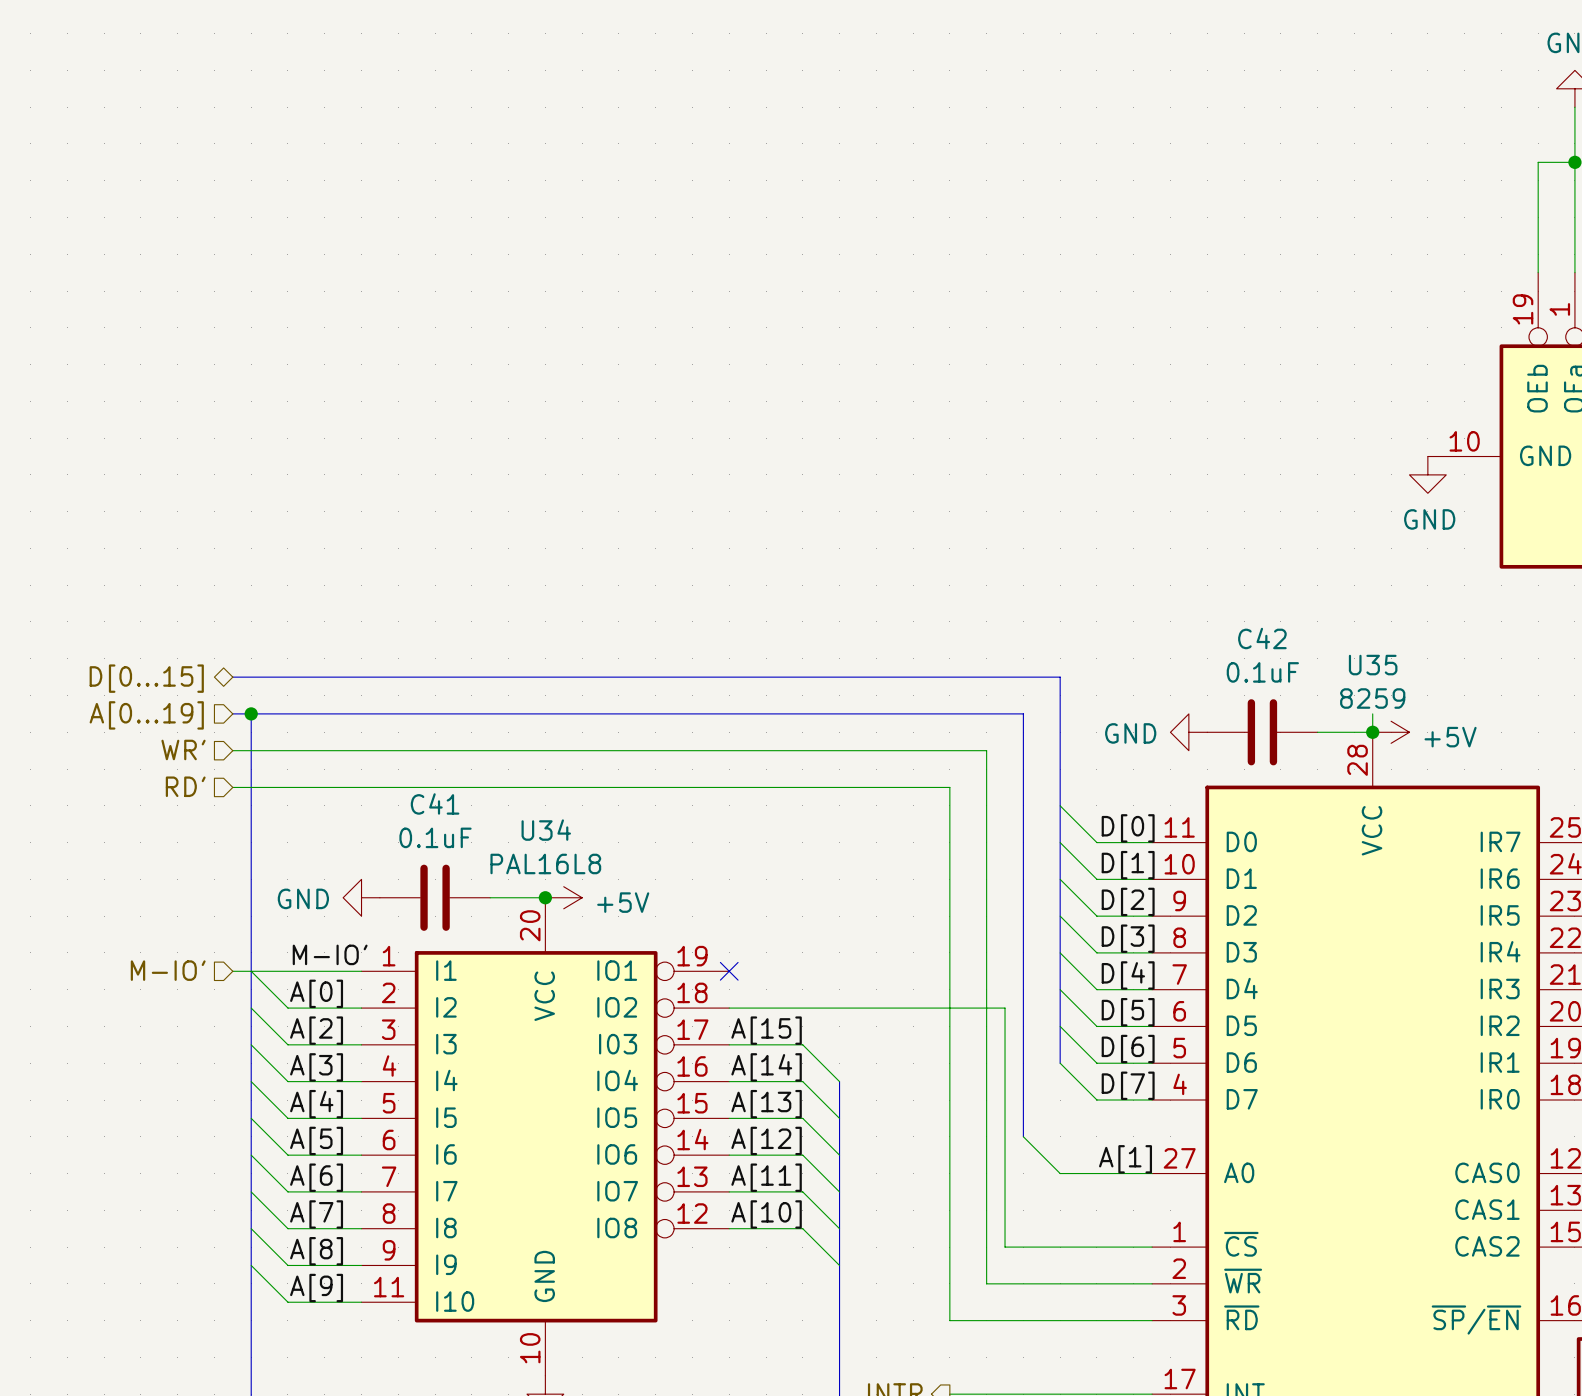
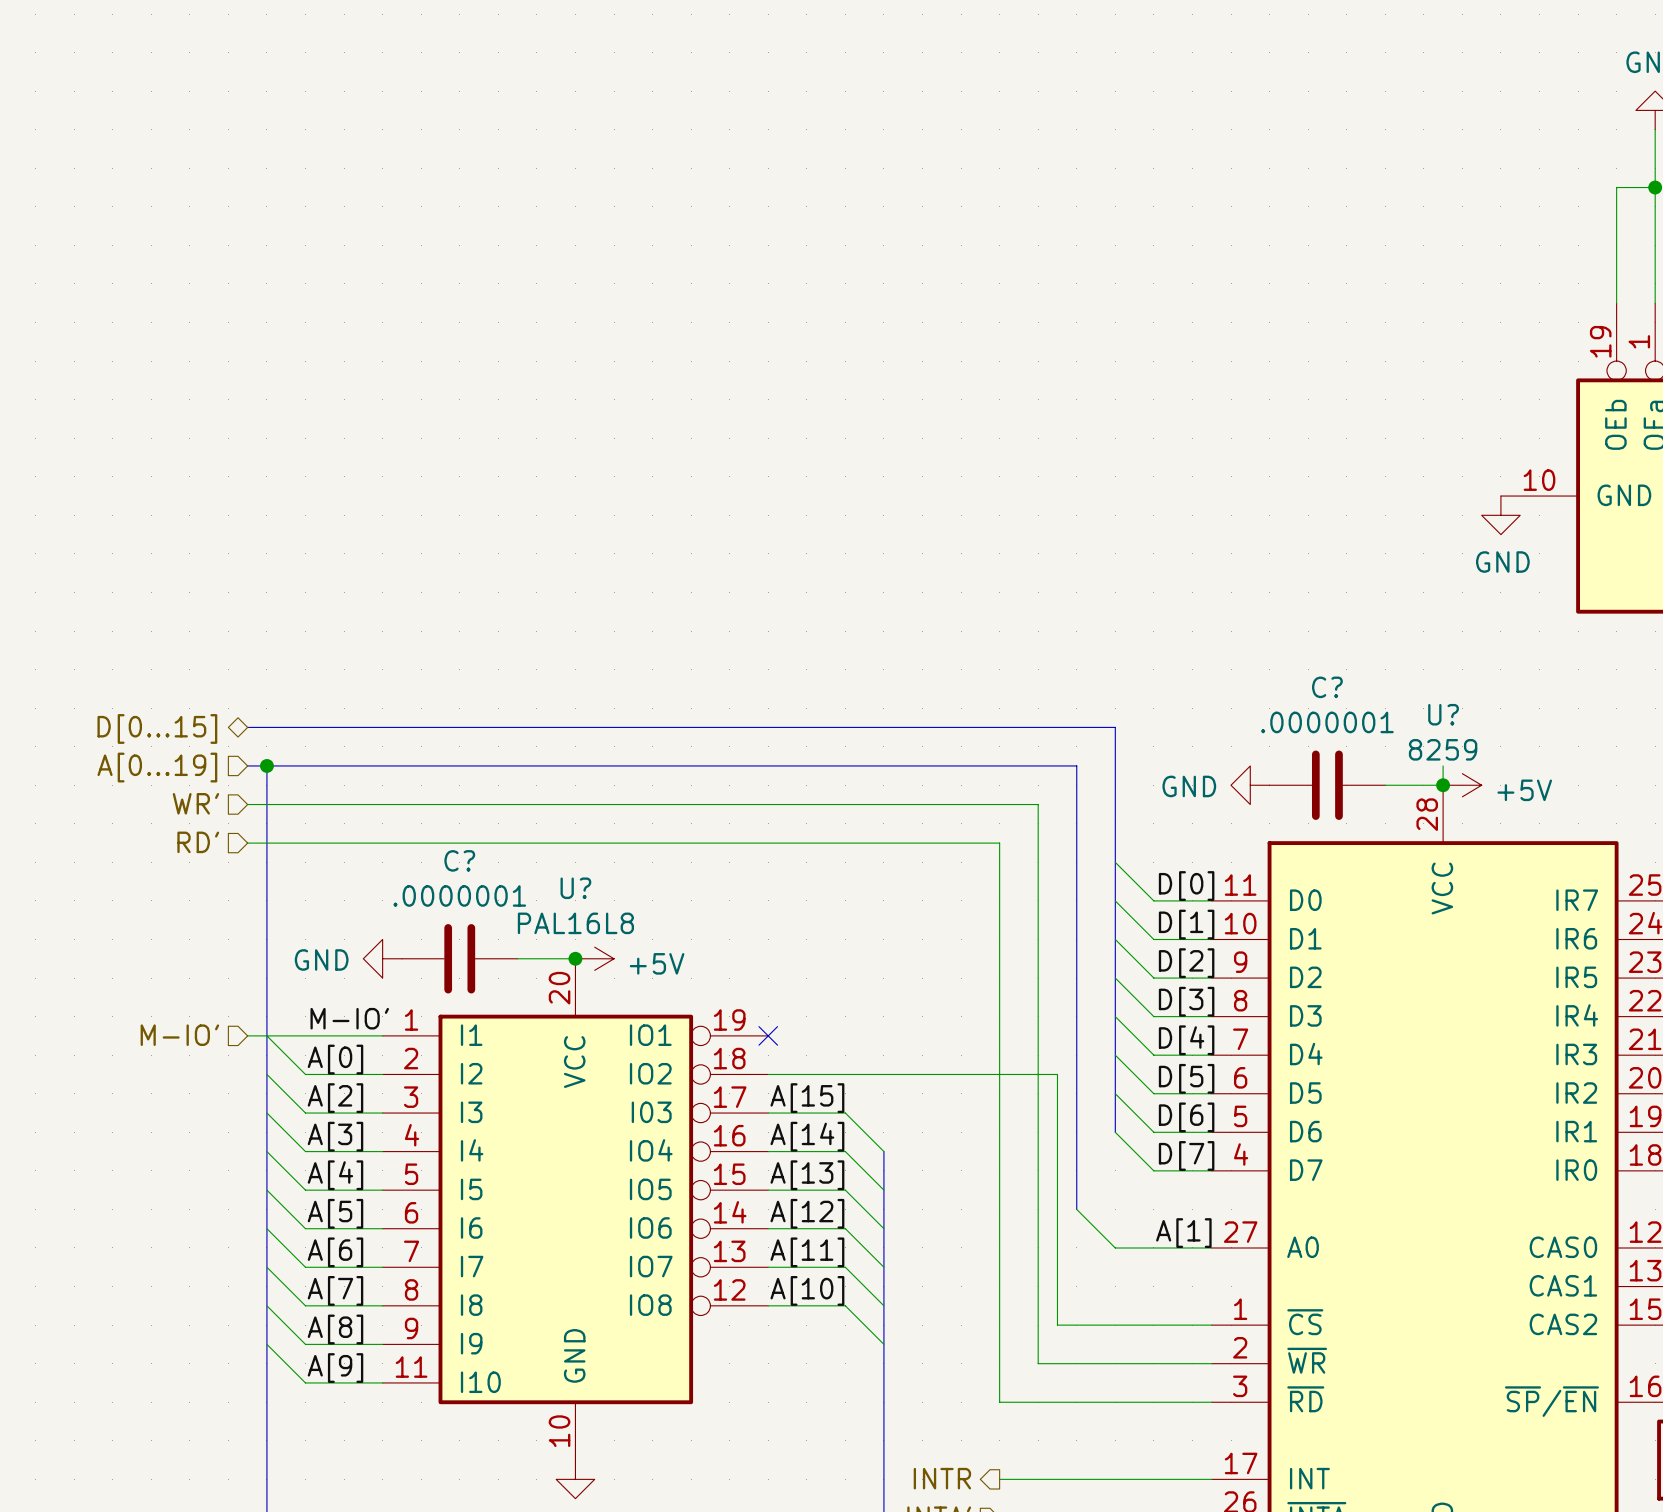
C42 name: C42 (1262, 638) -> C? (1327, 687)
U35 name: U35 (1373, 665) -> U? (1443, 714)
C42 value: 0.1uF (1262, 672) -> .0000001 (1327, 722)
C41 name: C41 (435, 803) -> C? (459, 860)
U34 name: U34 (546, 830) -> U? (575, 888)
C41 value: 0.1uF (435, 837) -> .0000001 (459, 895)

